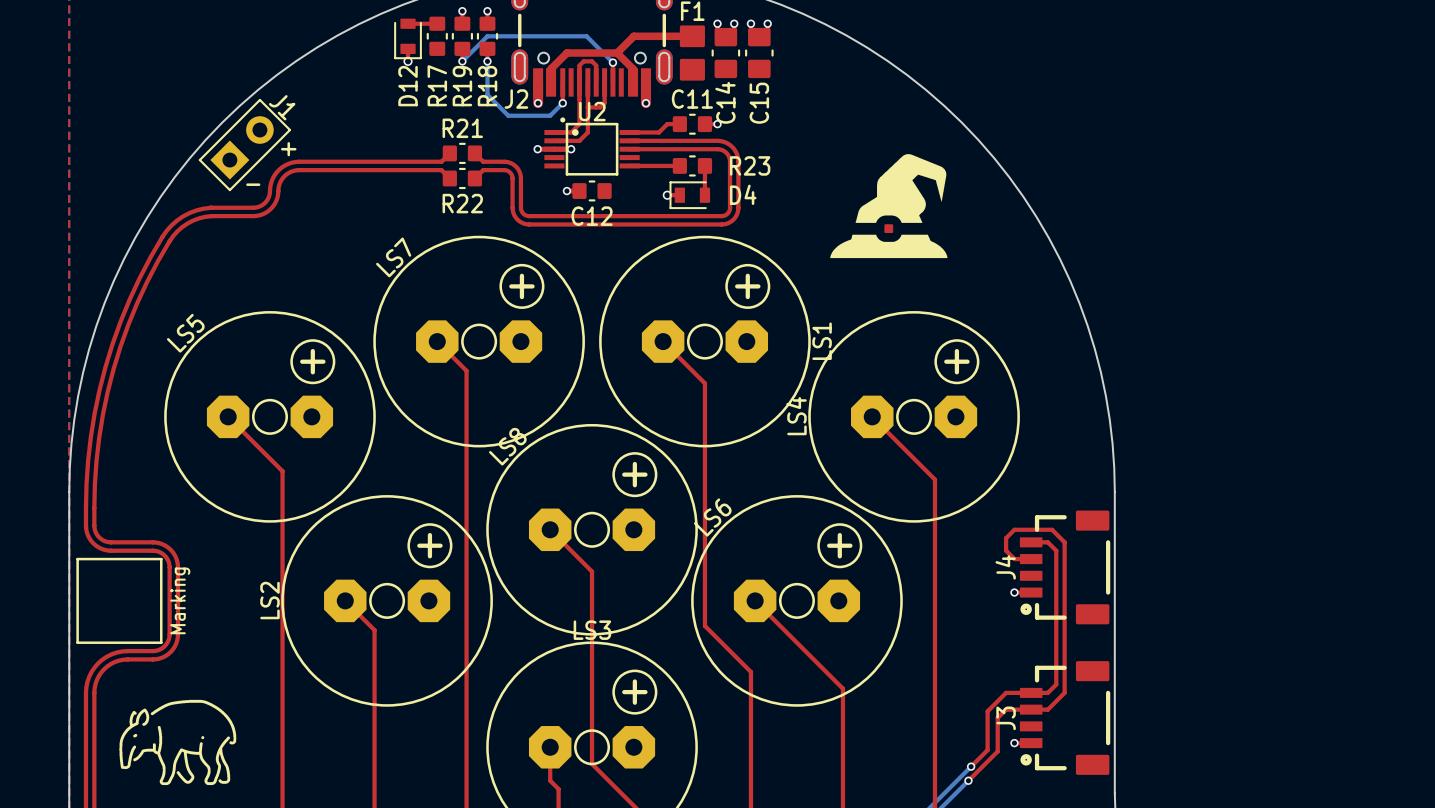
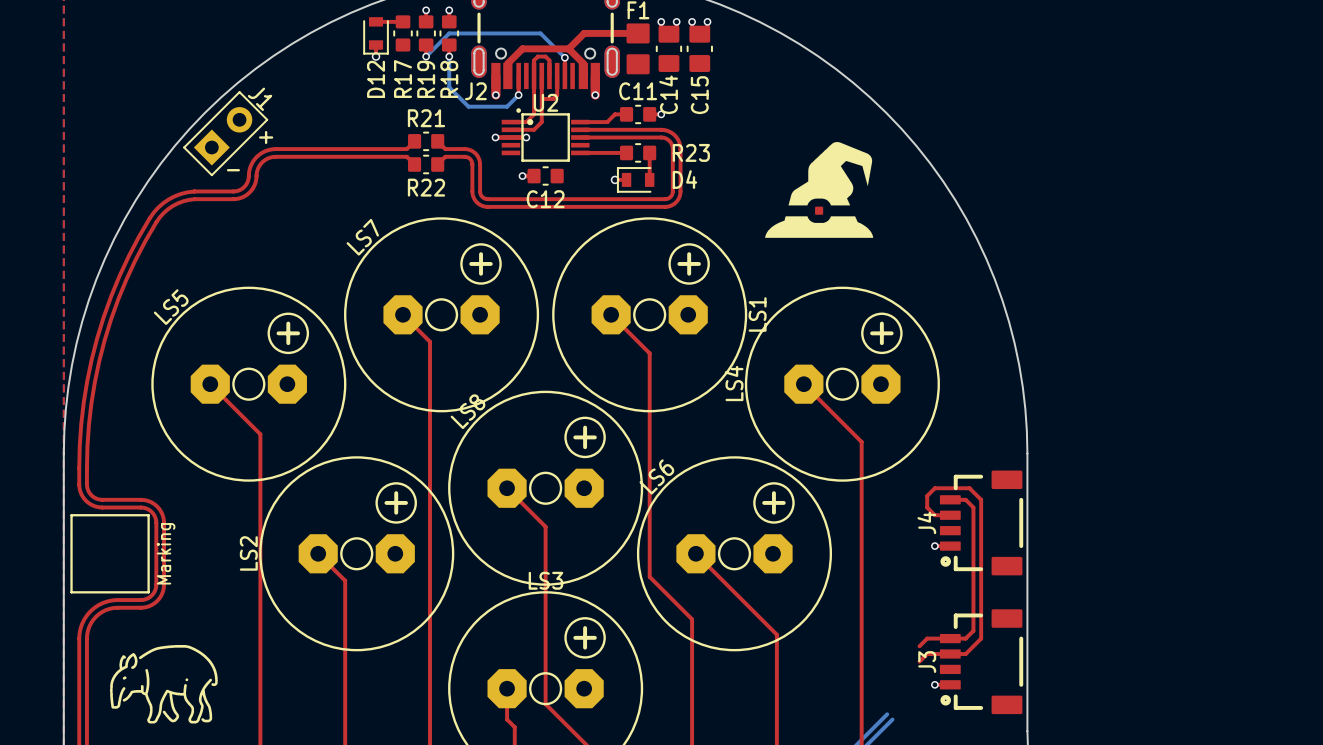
top track: (997, 701) (987, 711) (987, 750) (971, 766) -> none
top track: (997, 718) (997, 751) (968, 780) -> none
bottom track: (971, 766) (962, 775) -> none
via: (971, 766) -> none
via: (968, 780) -> none

